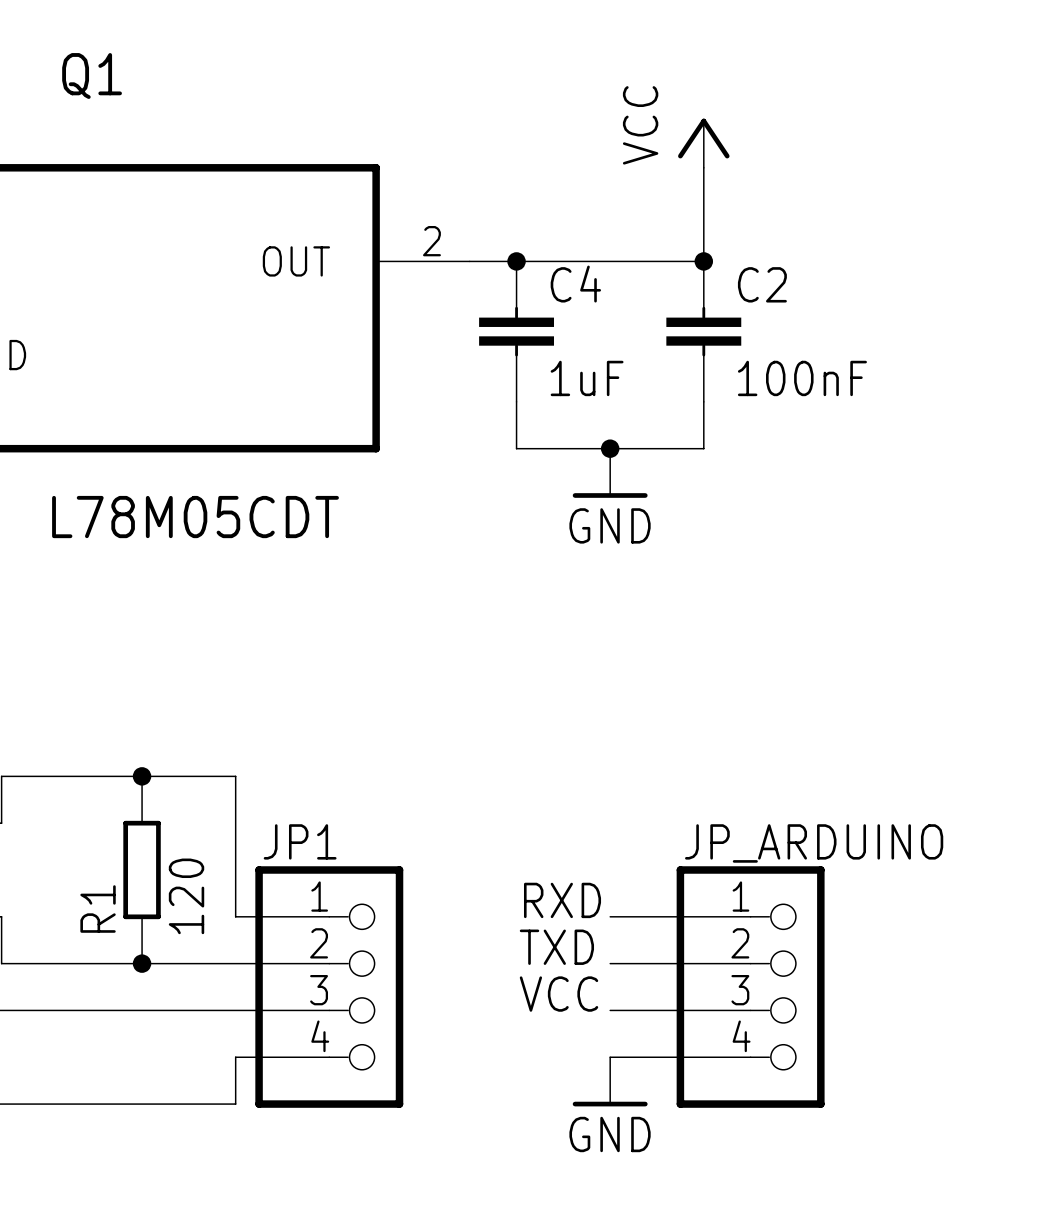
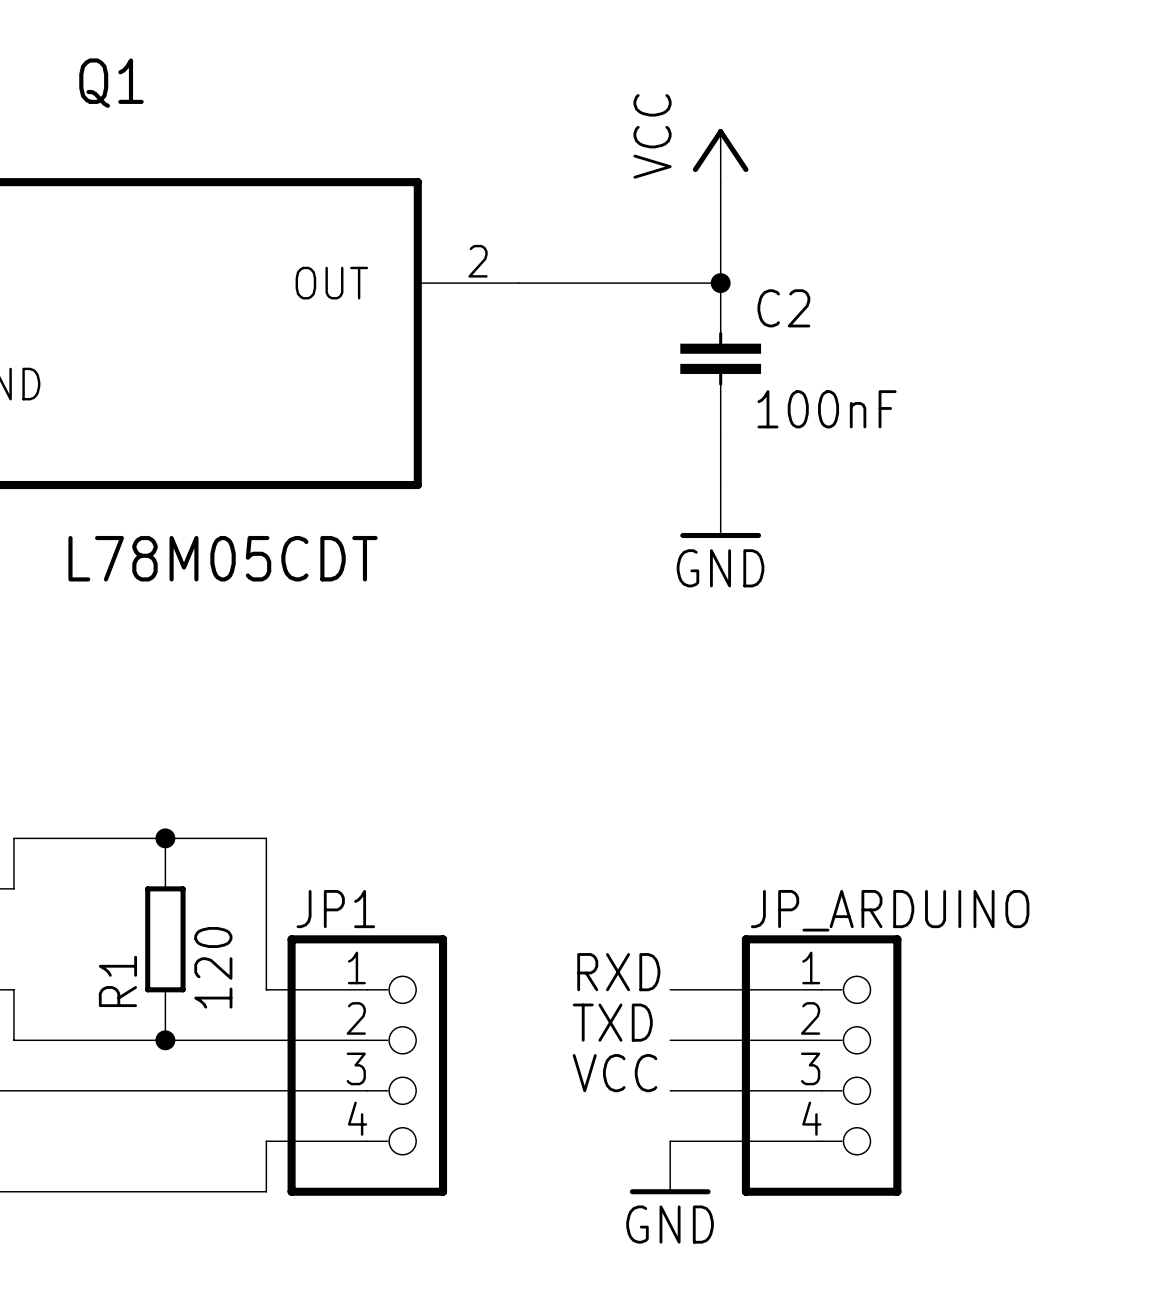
power symbol position: VCC (703, 143) -> VCC (720, 155)
wire: (703, 167) (703, 261) (656, 261) -> (720, 182) (720, 283)
junction: (516, 261) -> none
junction position: (703, 261) -> (720, 283)
C4: 1uF (516, 331) -> none
C2 position: (703, 331) -> (720, 358)
wire: (516, 401) (516, 448) (703, 448) (703, 401) -> none
wire: none -> (720, 434) (720, 485)
junction: (610, 448) -> none
power symbol position: GND (610, 473) -> GND (720, 511)

